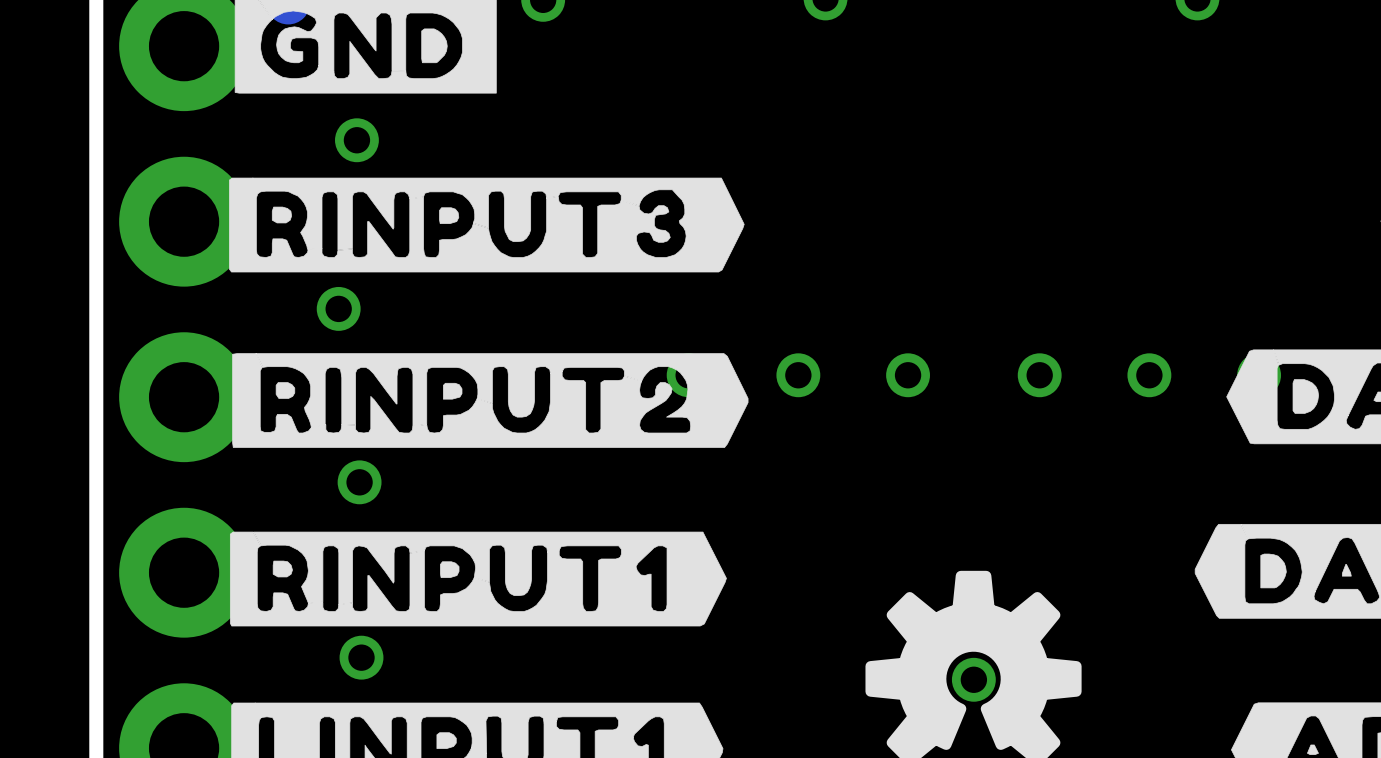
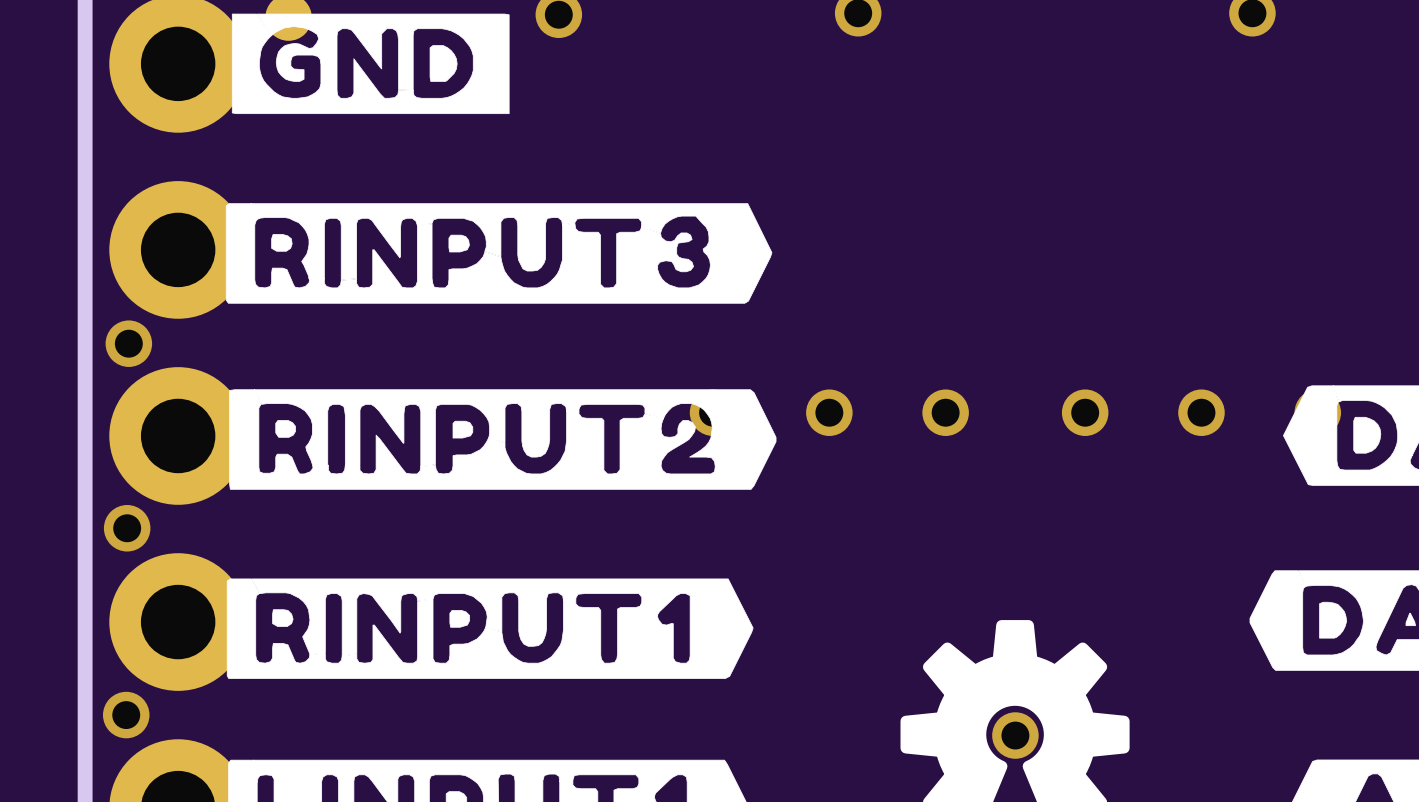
via: (356, 140) -> none
via: (338, 308) -> none
via: none -> (128, 343)
via: (359, 482) -> none
via: none -> (127, 528)
via: (361, 657) -> none
via: none -> (126, 715)

